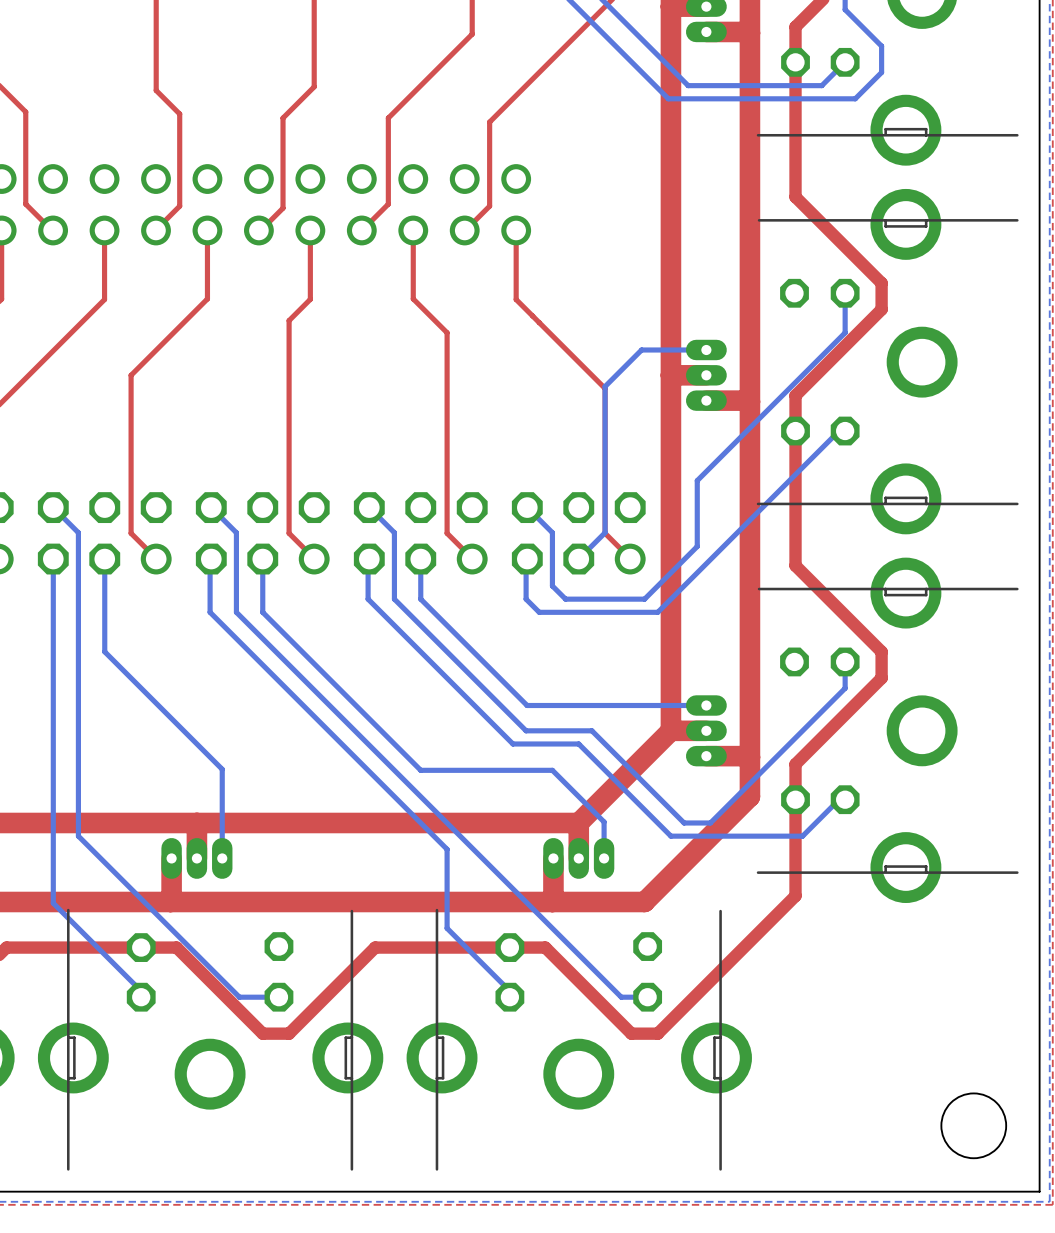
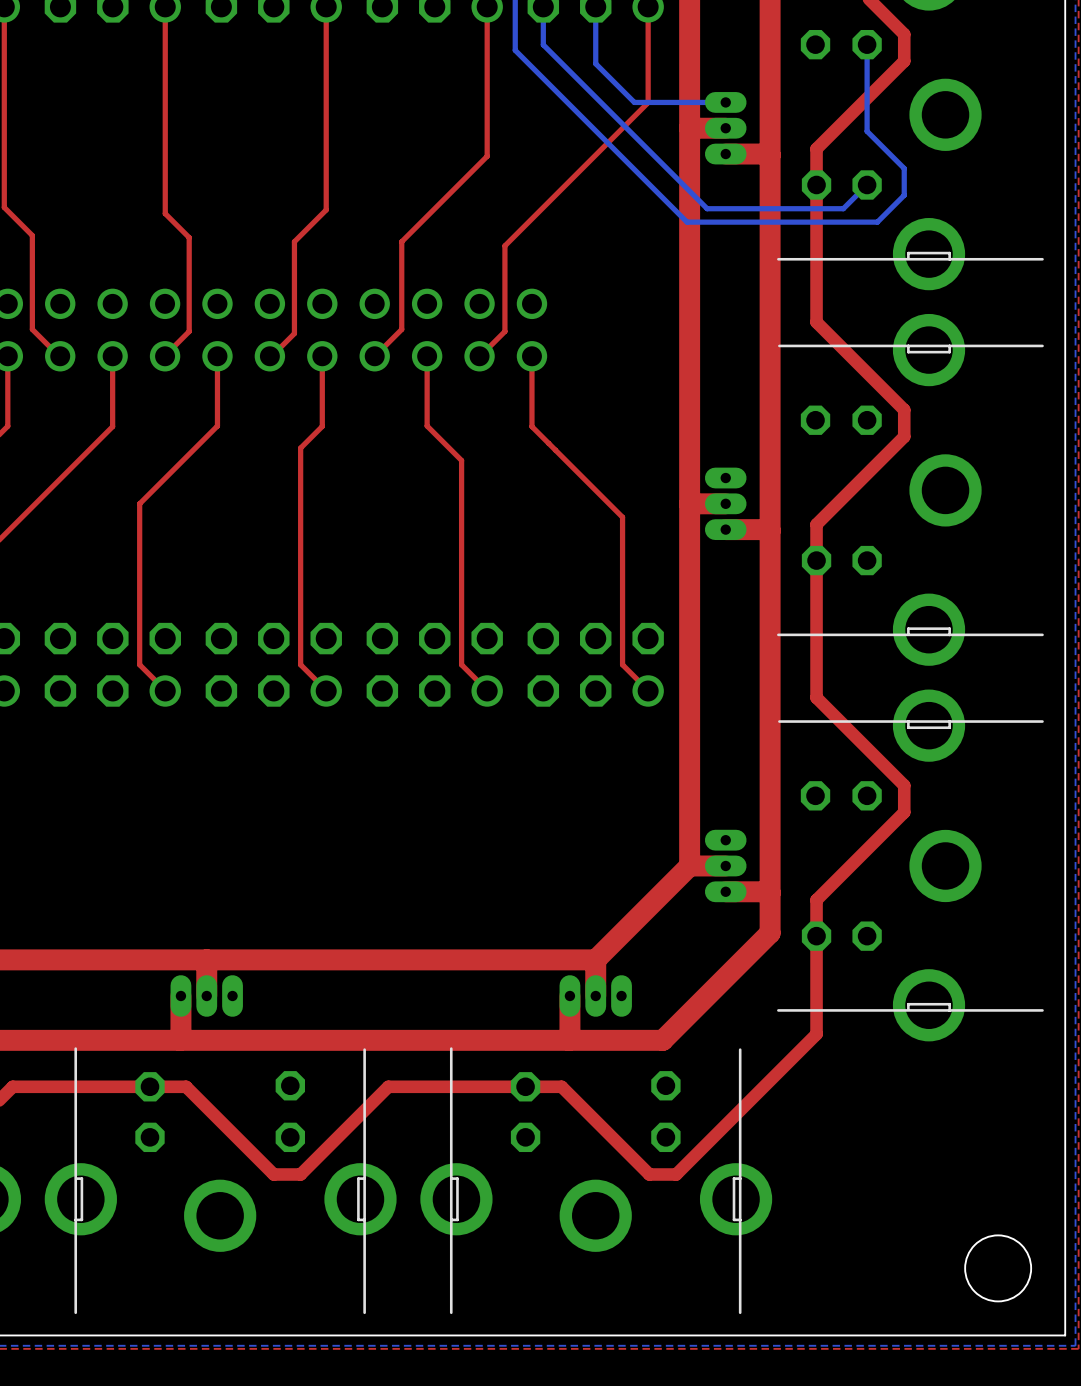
bottom track: (845, 293) (845, 332) (697, 480) (697, 546) (644, 599) (565, 599) (552, 585) (552, 532) (527, 507) -> none
bottom track: (706, 349) (641, 349) (605, 386) (605, 532) (578, 559) -> none
bottom track: (845, 431) (839, 431) (657, 612) (539, 612) (526, 599) (527, 559) -> none
bottom track: (53, 507) (78, 532) (78, 836) (239, 997) (278, 997) -> none
bottom track: (211, 507) (236, 532) (236, 612) (621, 997) (647, 997) -> none
bottom track: (369, 507) (394, 532) (394, 599) (526, 730) (591, 730) (684, 822) (710, 822) (845, 688) (845, 661) -> none
bottom track: (53, 559) (53, 903) (141, 991) (141, 997) -> none
bottom track: (104, 559) (104, 651) (222, 769) (222, 858) -> none
bottom track: (211, 559) (210, 612) (447, 849) (447, 928) (509, 991) (509, 997) -> none
bottom track: (262, 559) (262, 612) (420, 770) (552, 770) (604, 821) (604, 858) -> none
bottom track: (369, 559) (368, 599) (512, 743) (578, 743) (670, 836) (802, 836) (839, 799) (845, 799) -> none
bottom track: (420, 559) (420, 599) (527, 705) (706, 705) -> none

